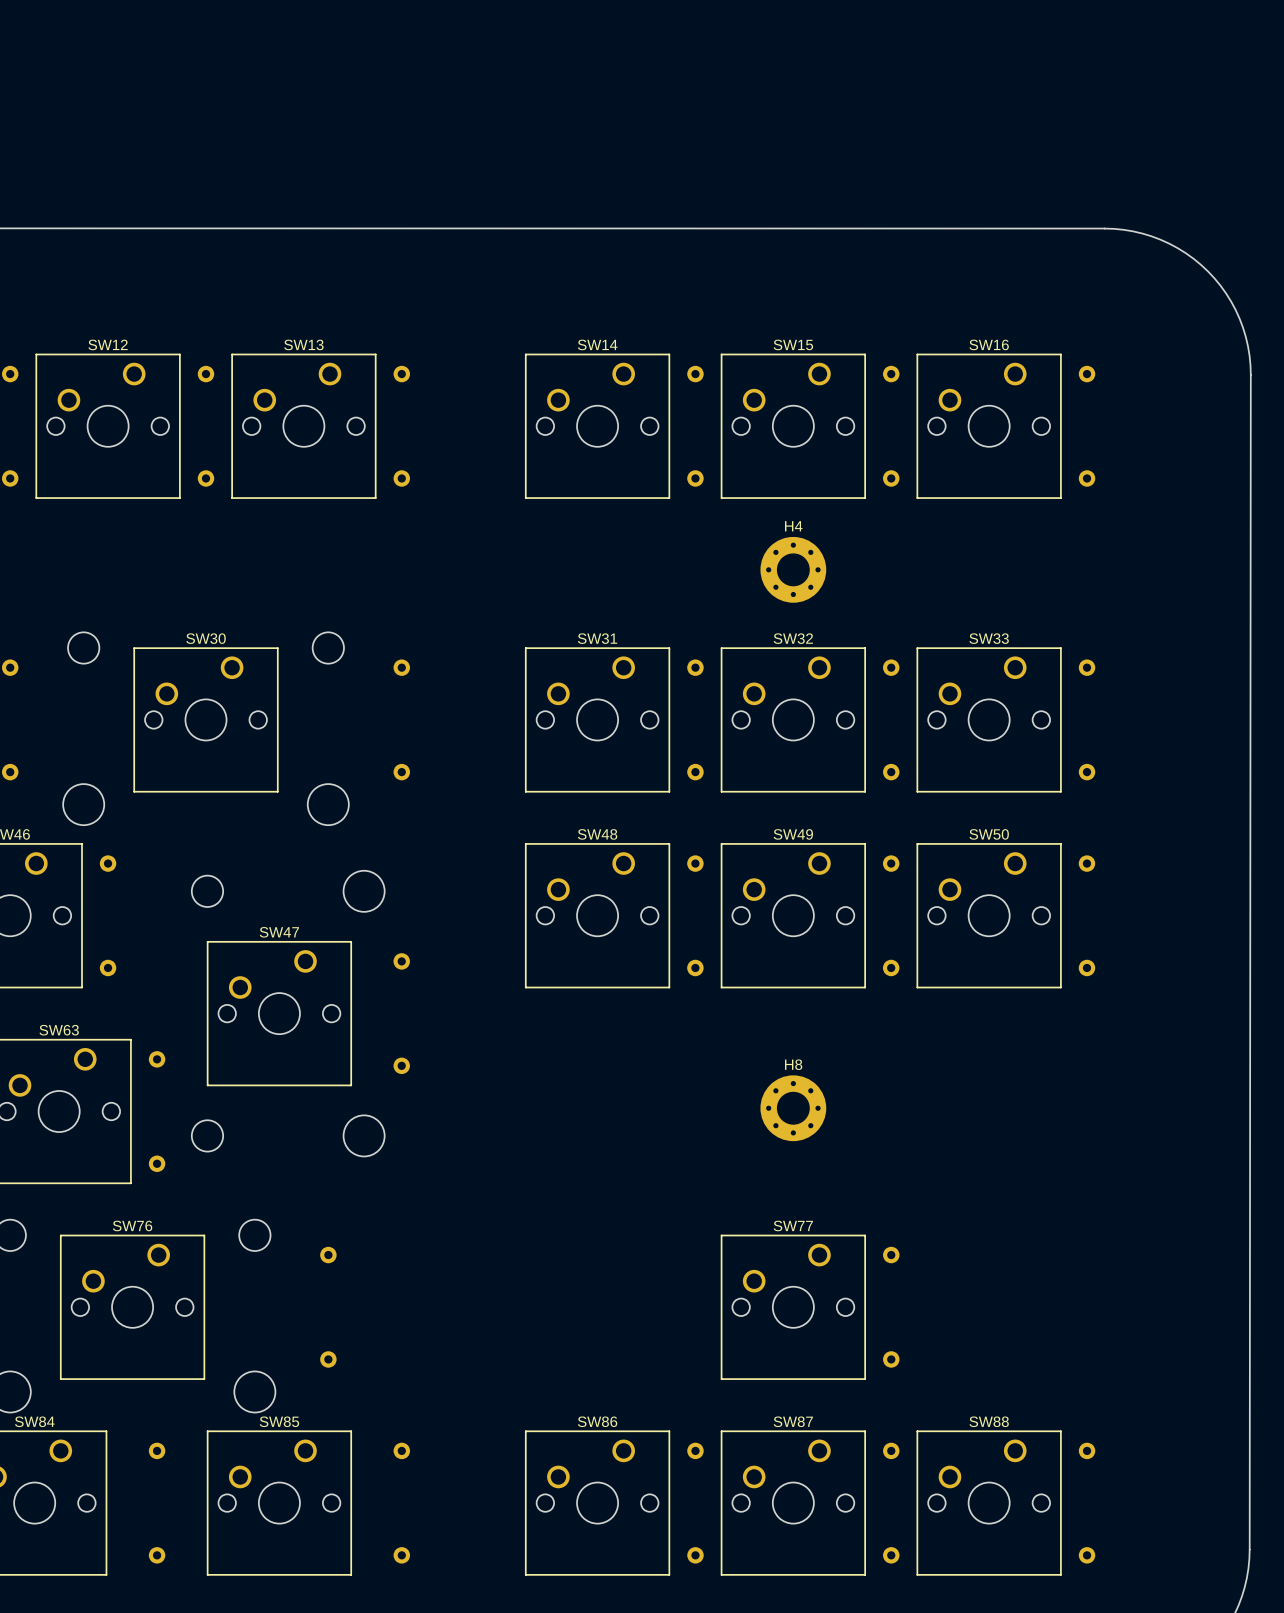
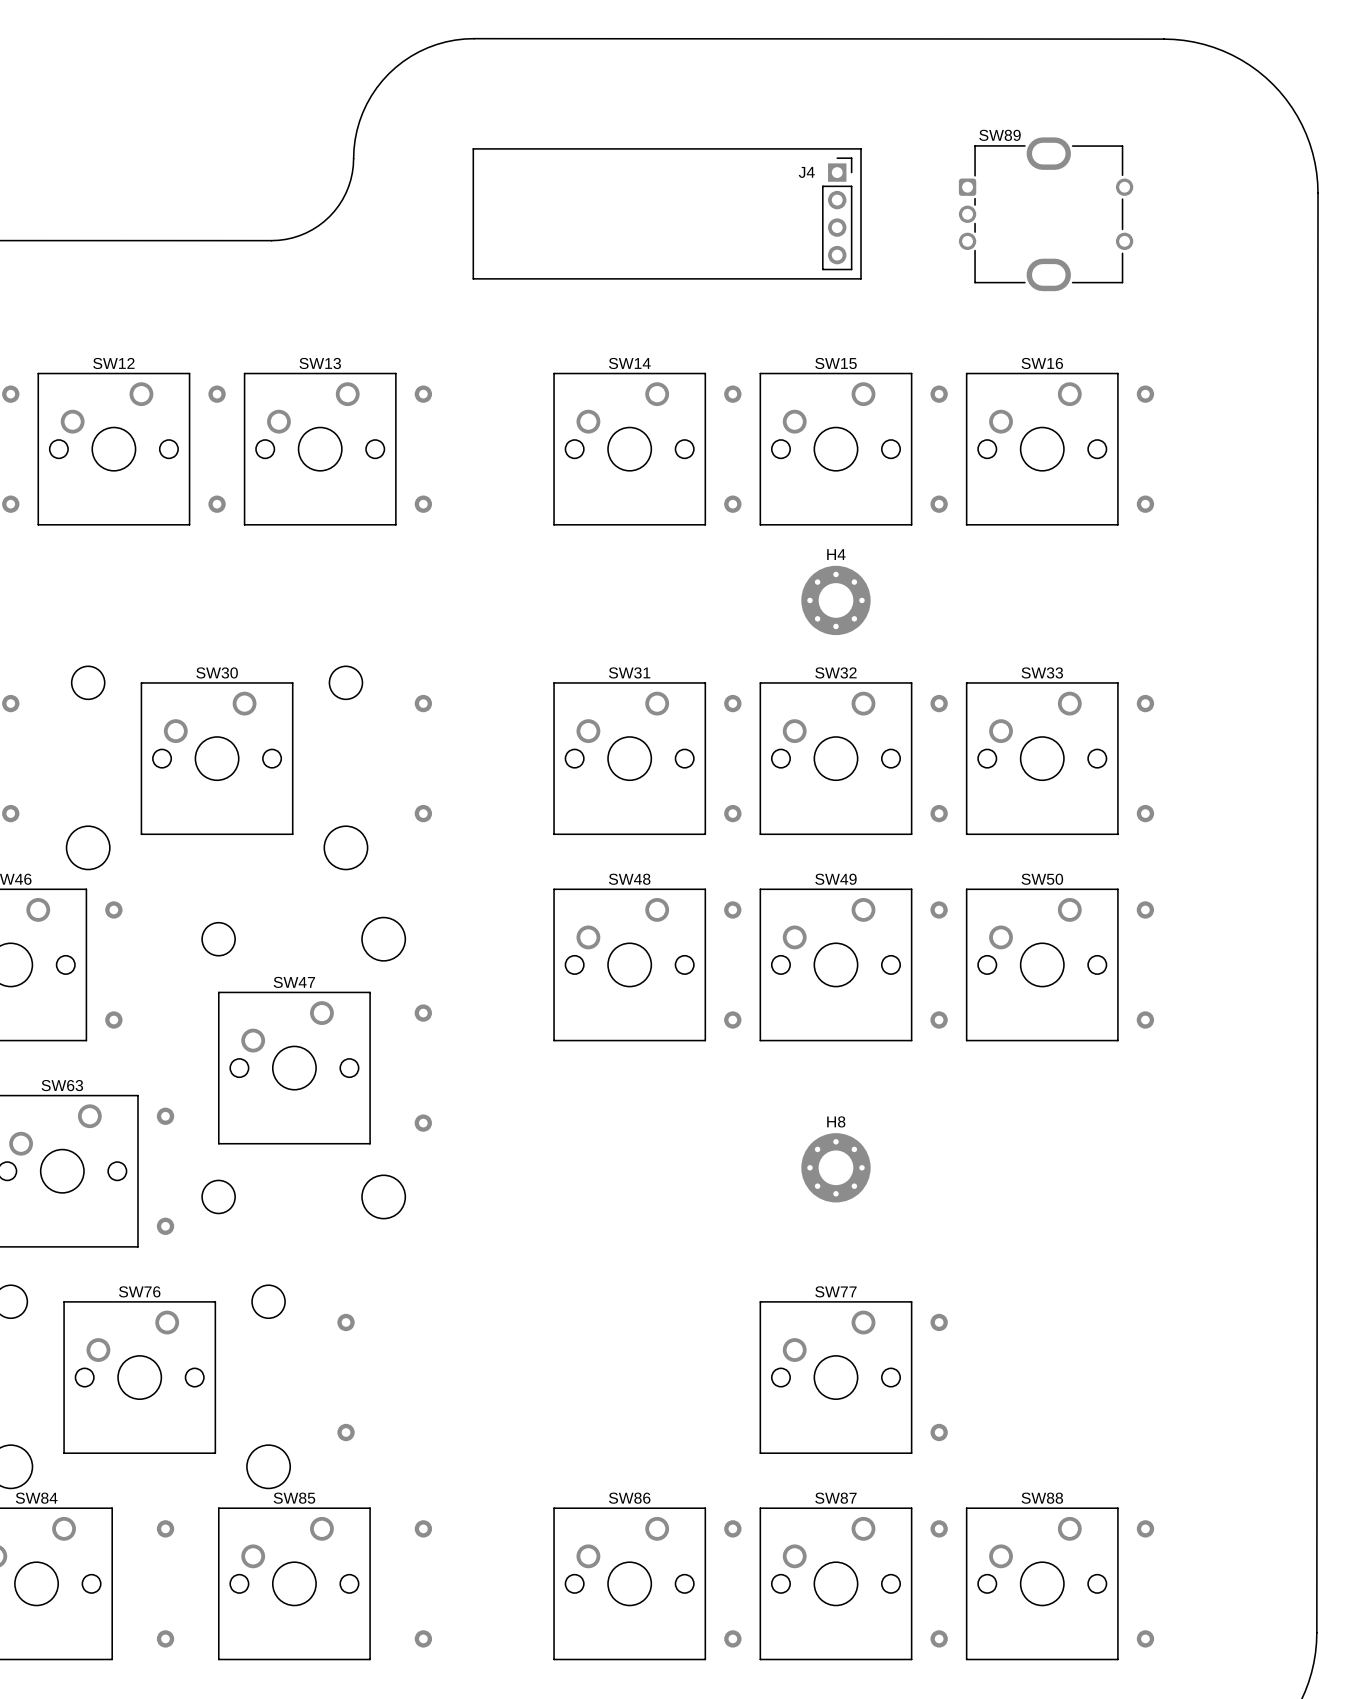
line: none -> (473, 148) (861, 148) (861, 278) (473, 278) (473, 148)
J4: none -> (837, 213)
SW89: none -> (1046, 214)
board edge: (257, 228) (1114, 228) (1142, 233) (1169, 243) (1201, 264) (1220, 285) (1231, 301) (1243, 327) (1249, 355) (1250, 374) (1249, 1549) -> (271, 240) (285, 239) (306, 232) (324, 221) (334, 211) (348, 186) (359, 121) (376, 87) (395, 67) (411, 56) (436, 44) (455, 40) (1173, 39) (1203, 44) (1232, 55) (1257, 70) (1286, 99) (1297, 116) (1309, 143) (1316, 173) (1318, 193) (1316, 1632)

